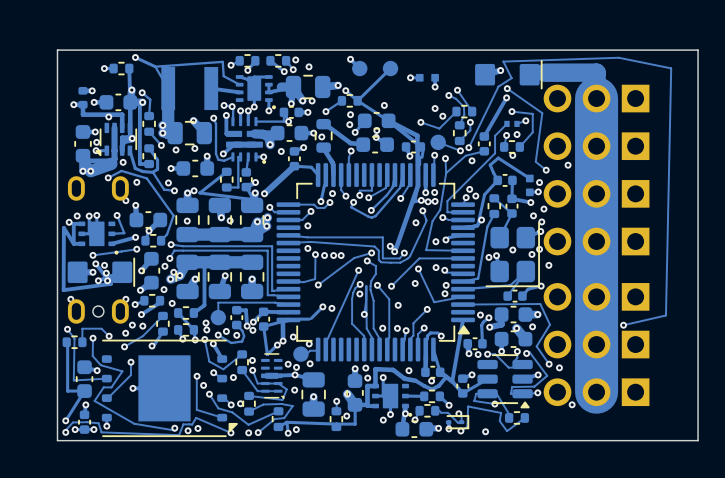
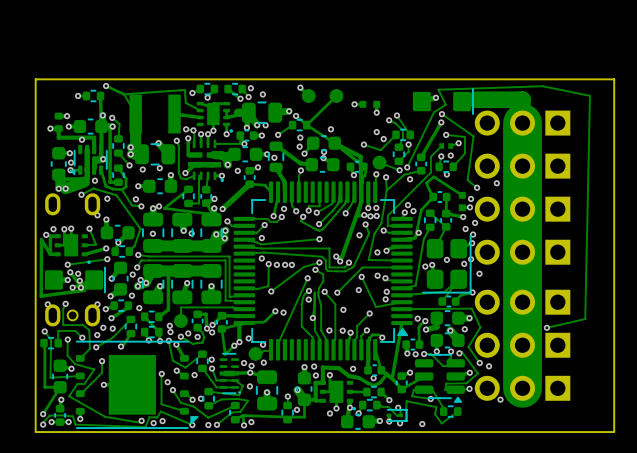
track: none -> (319, 239) (260, 244) (244, 239)
via: none -> (319, 239)
track: none -> (65, 303) (63, 309) (63, 325) (83, 325) (89, 329) (89, 348) (80, 358)
via: none -> (65, 303)

